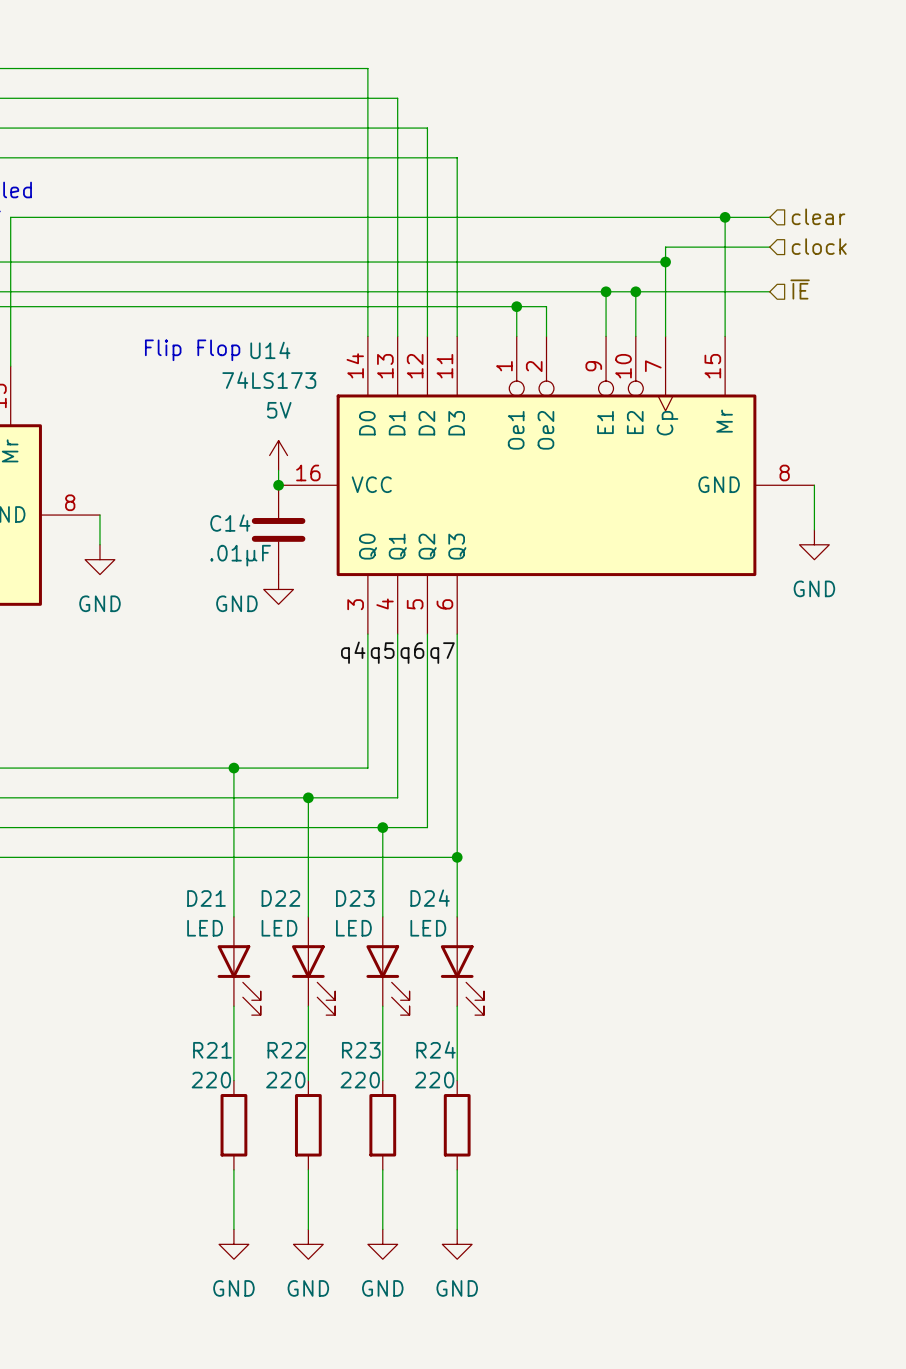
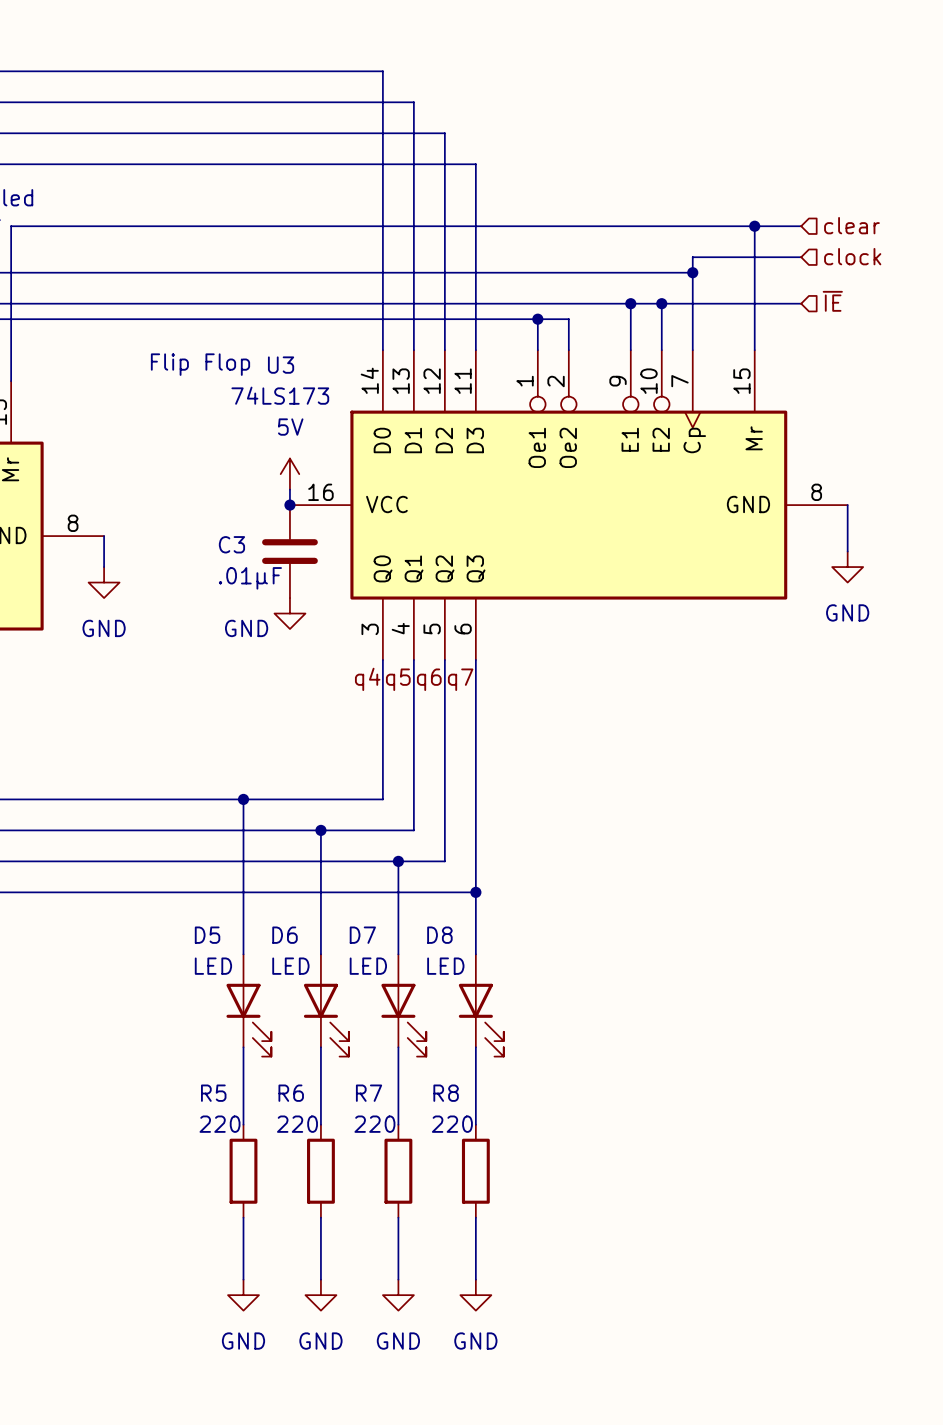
U14 name: U14 (270, 350) -> U3 (281, 365)
C14 name: C14 (230, 523) -> C3 (231, 544)
D21 name: D21 (206, 898) -> D5 (207, 935)
D22 name: D22 (280, 898) -> D6 (285, 935)
D23 name: D23 (355, 898) -> D7 (362, 935)
D24 name: D24 (430, 898) -> D8 (439, 935)
R24 name: R24 (436, 1049) -> R8 (446, 1093)
R21 name: R21 (212, 1050) -> R5 (213, 1093)
R22 name: R22 (286, 1050) -> R6 (291, 1093)
R23 name: R23 (361, 1050) -> R7 (369, 1093)

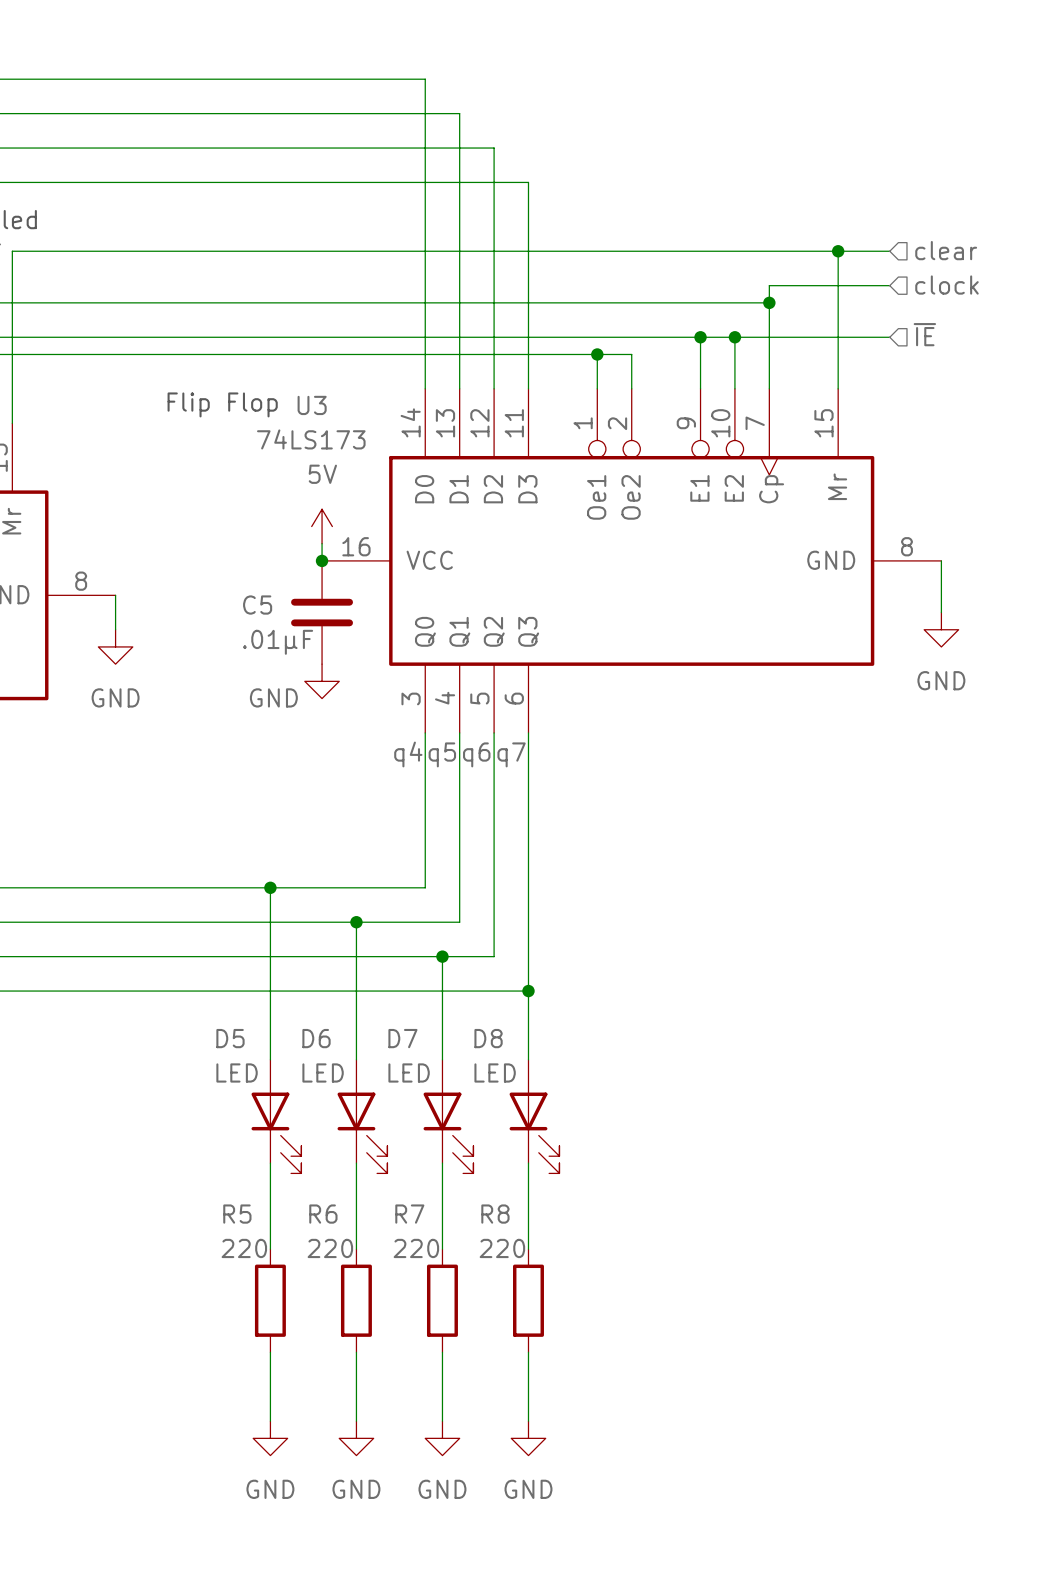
C3 name: C3 (231, 544) -> C5 (257, 605)

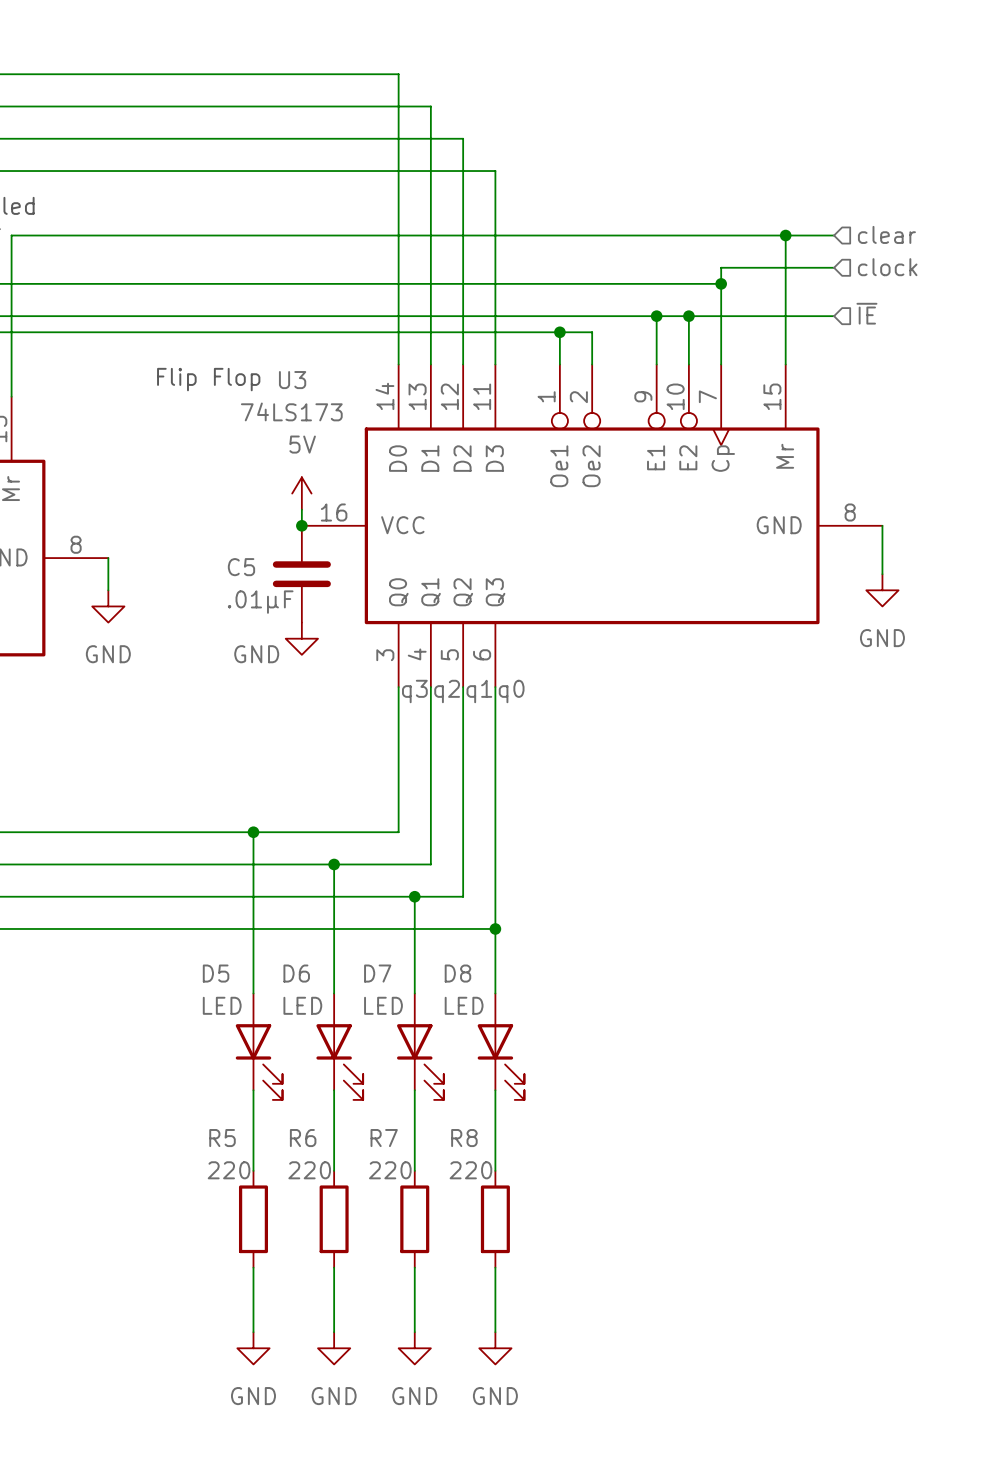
label: none -> q3 (414, 691)
label: none -> q2 (447, 691)
label: none -> q1 (479, 691)
label: none -> q0 (511, 691)
label: q4 (408, 754) -> none
label: q5 (442, 754) -> none
label: q6 (476, 754) -> none
label: q7 (511, 754) -> none

